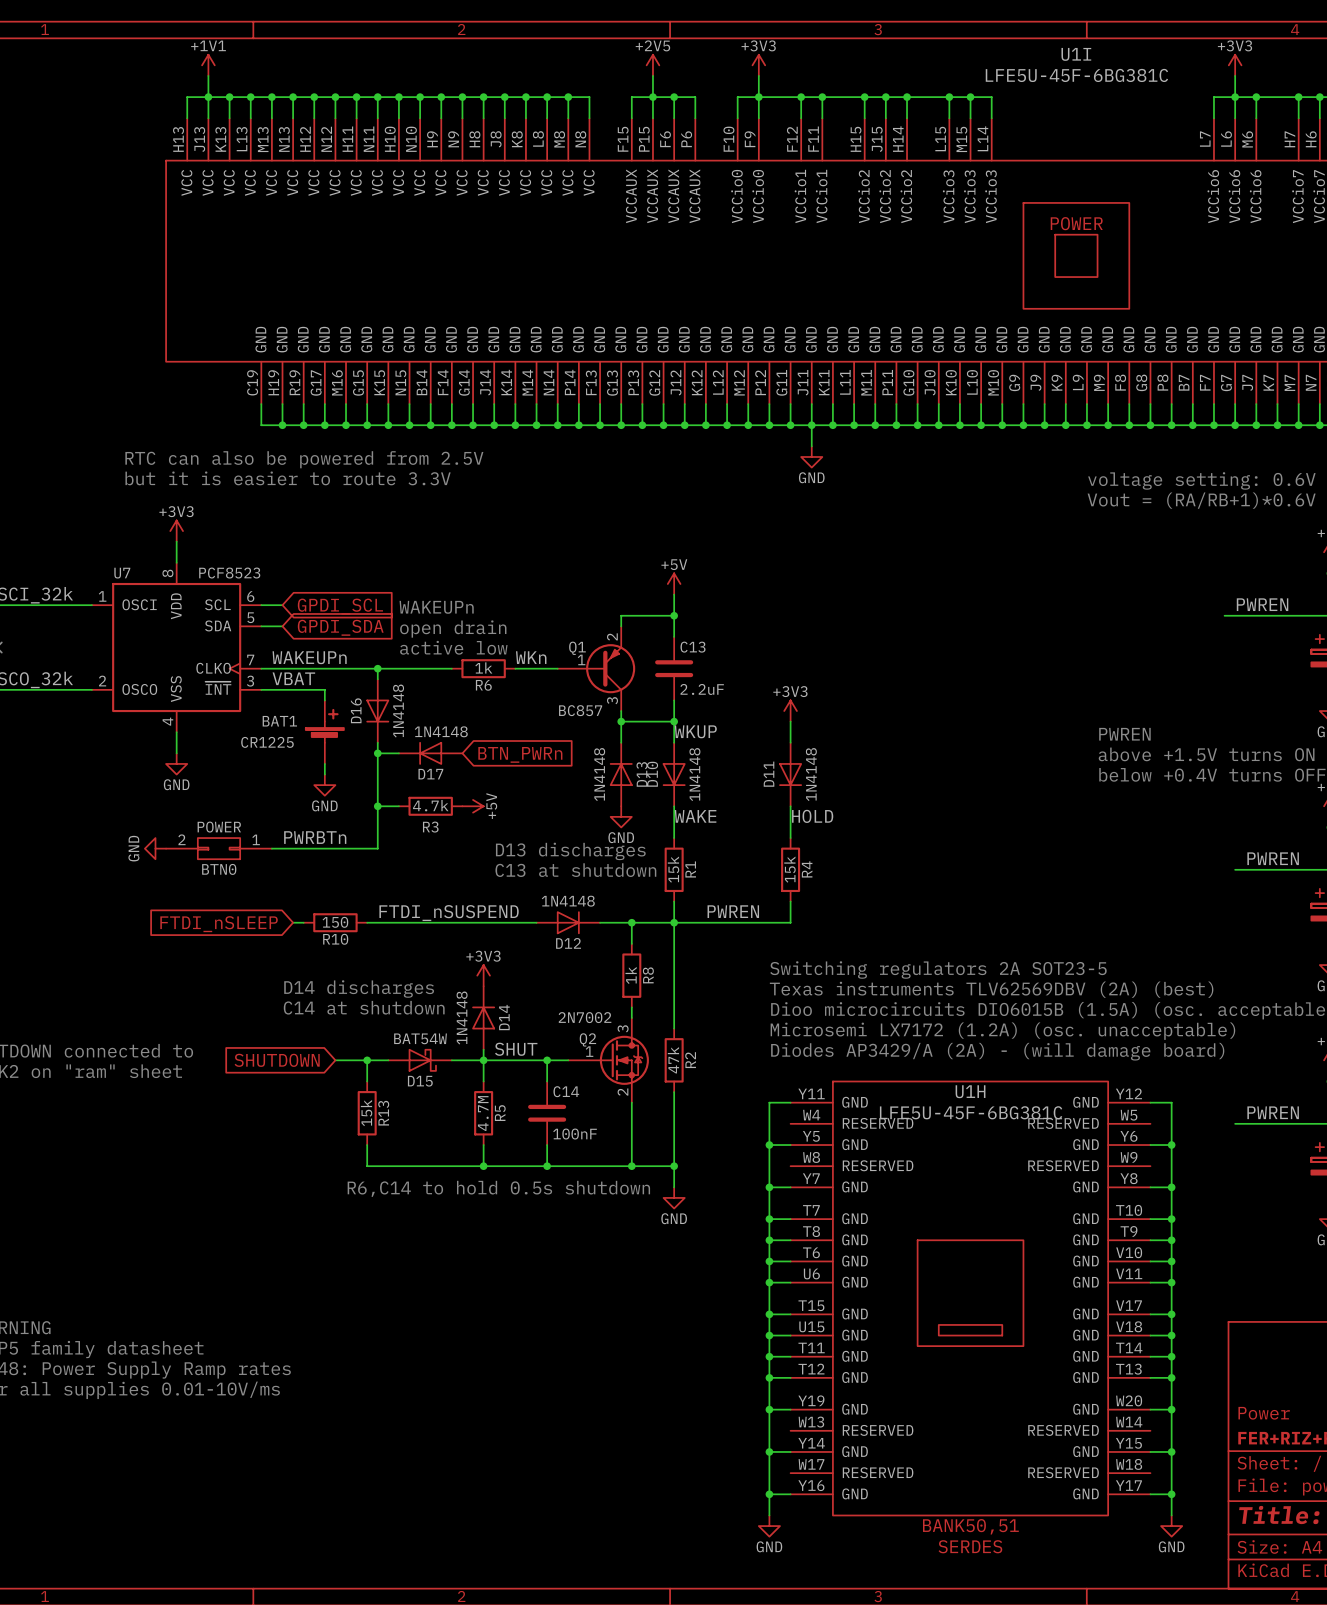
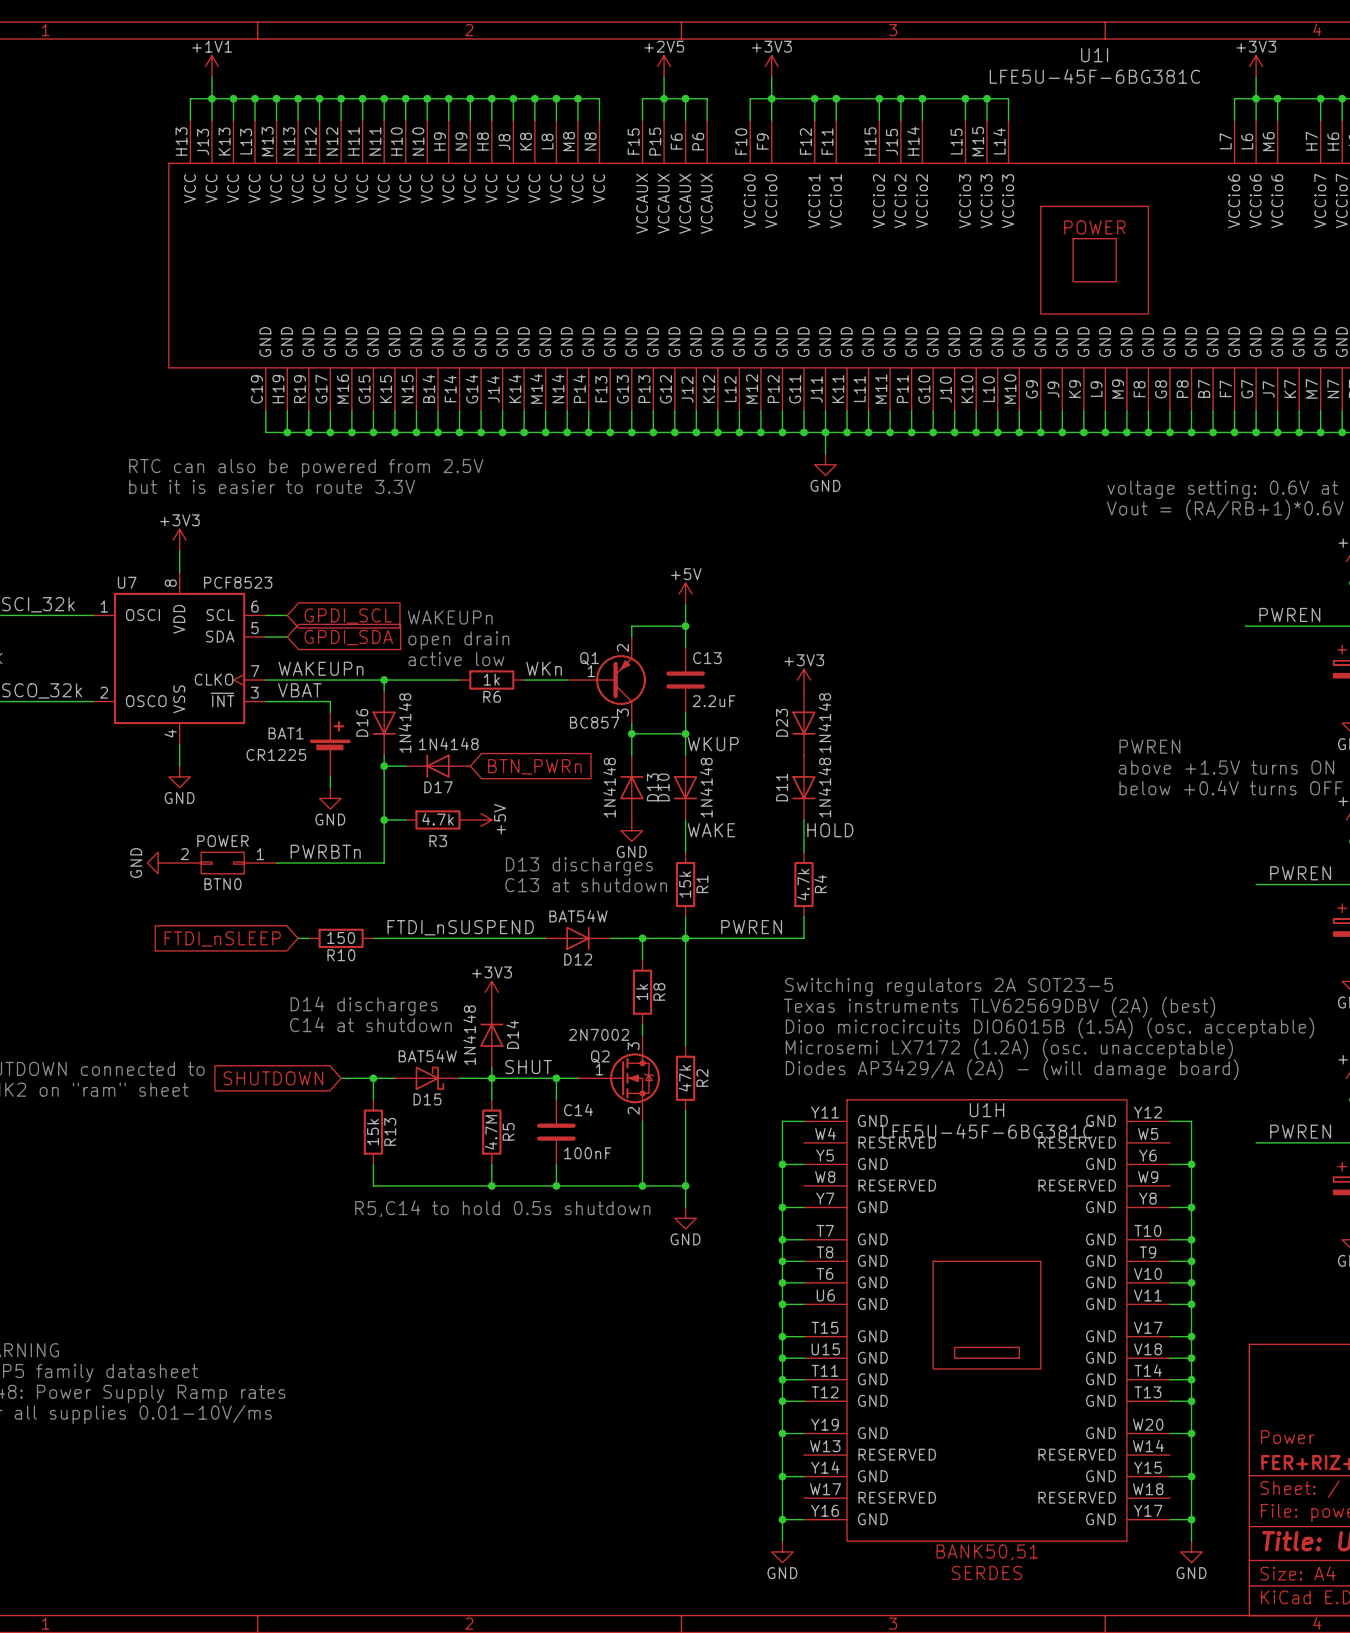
D23: none -> 1N4148 (803, 723)
power symbol position: +3V3 (790, 711) -> +3V3 (803, 680)
R4 value: 15k (789, 869) -> 4.7k (803, 884)
D12 value: 1N4148 (568, 901) -> BAT54W (578, 916)
text: R6,C14 to hold 0.5s shutdown (498, 1188) -> R5,C14 to hold 0.5s shutdown (502, 1208)

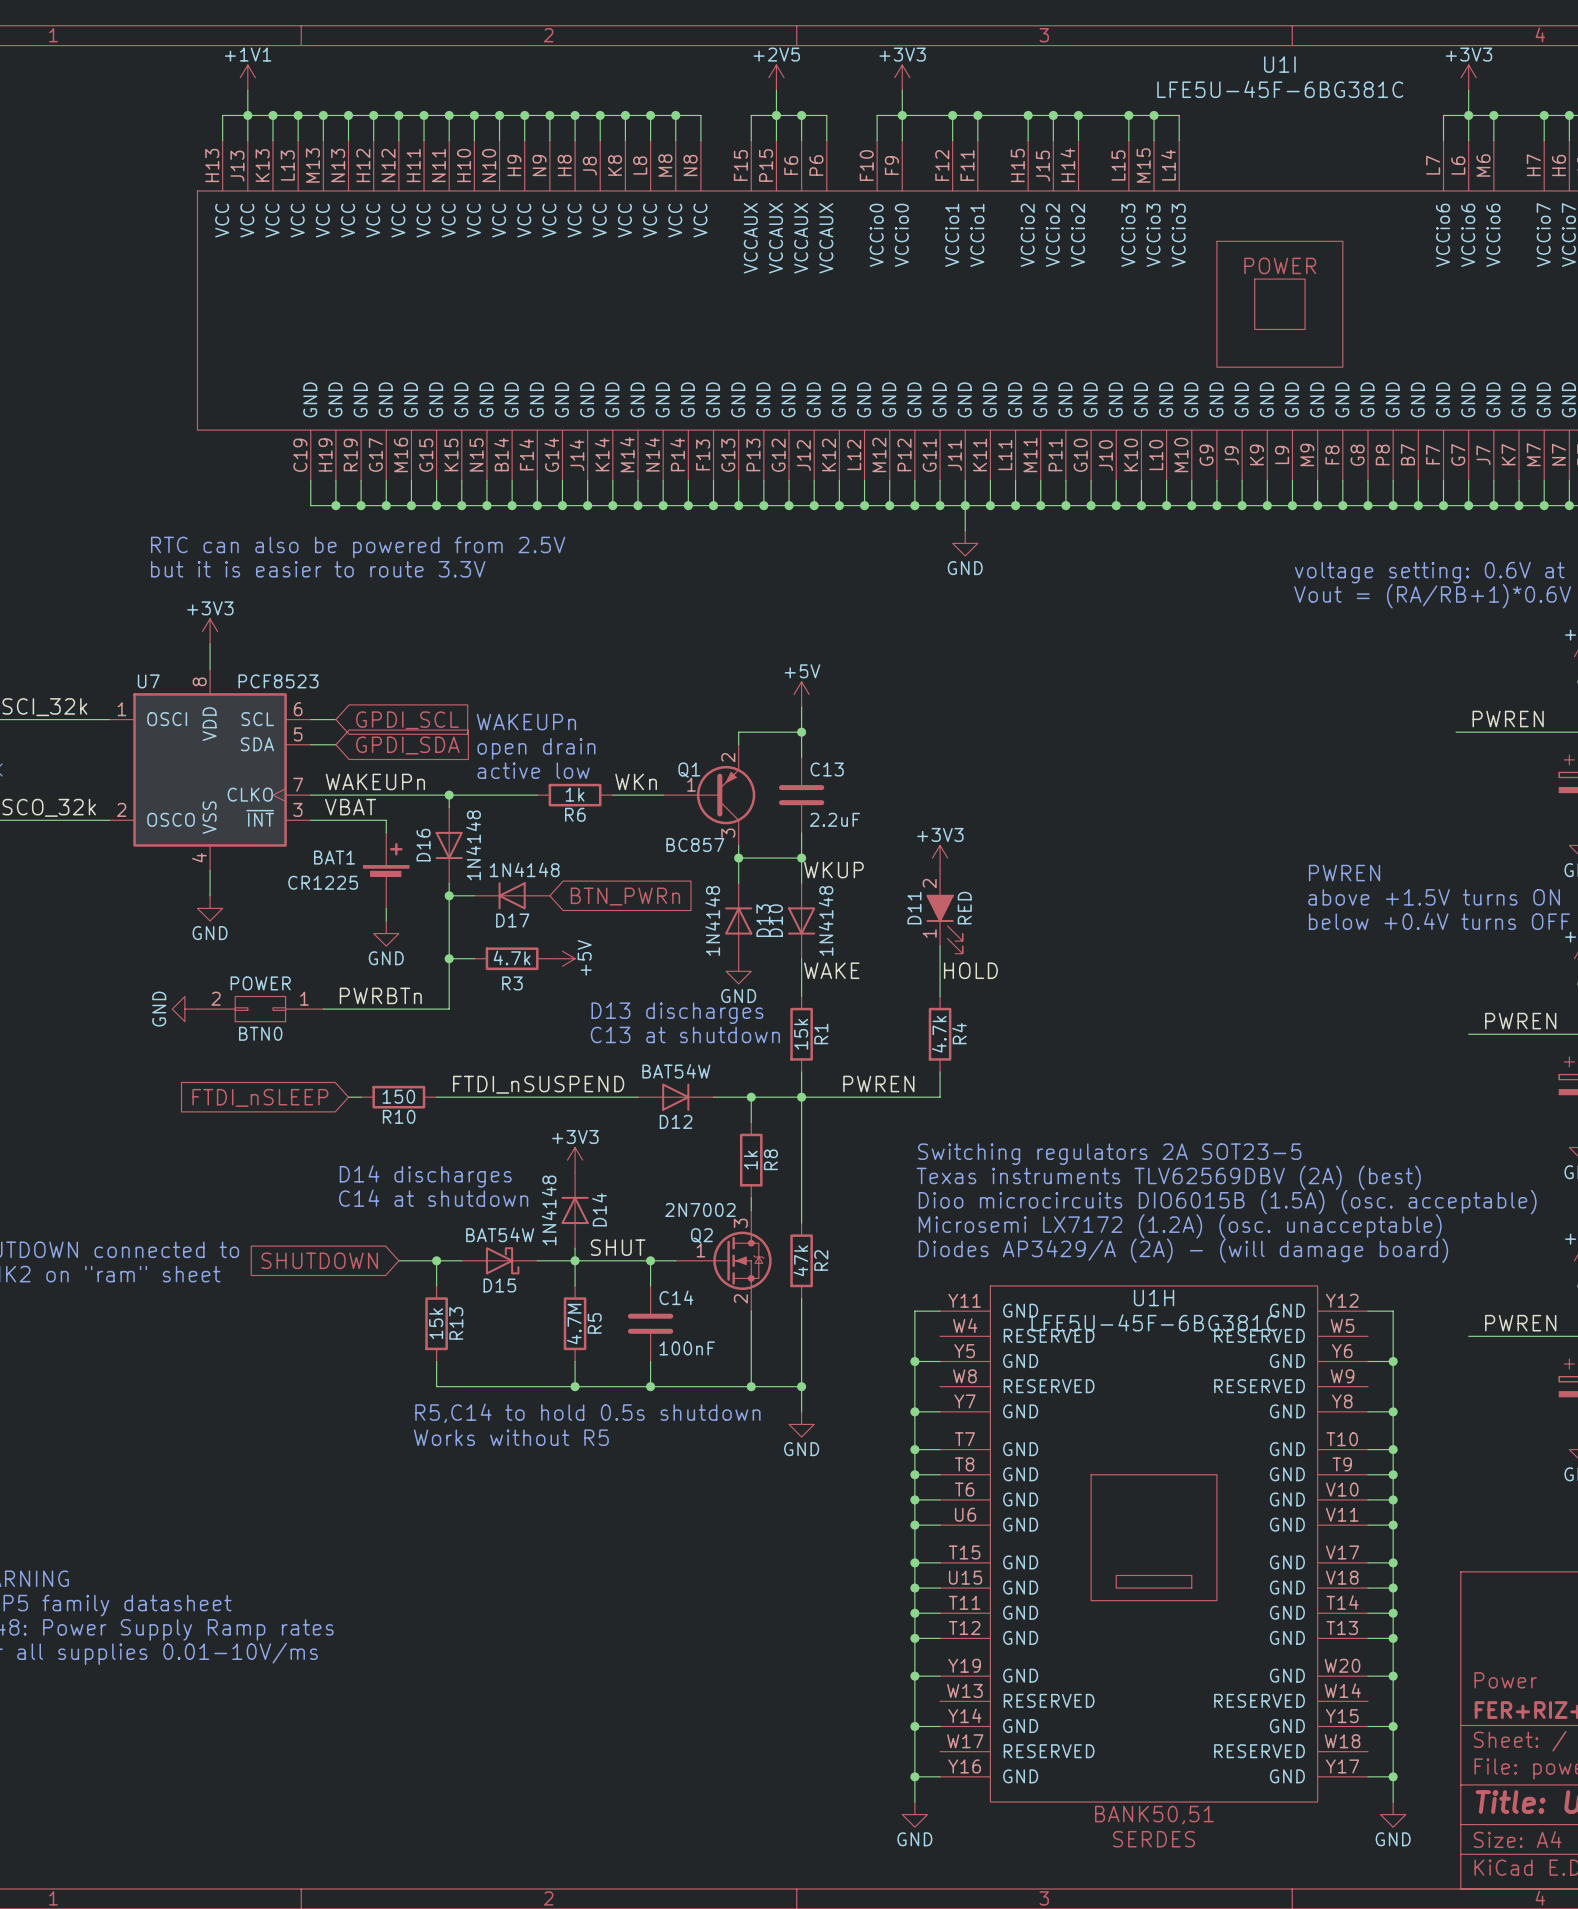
power symbol position: +3V3 (803, 680) -> +3V3 (940, 858)
D23: 1N4148 (803, 723) -> none
D11 symbol: [792, 755, 816, 820] -> [926, 870, 963, 954]
D11 value: 1N4148 (824, 787) -> RED (964, 908)
text: none -> Works without R5 (511, 1437)

